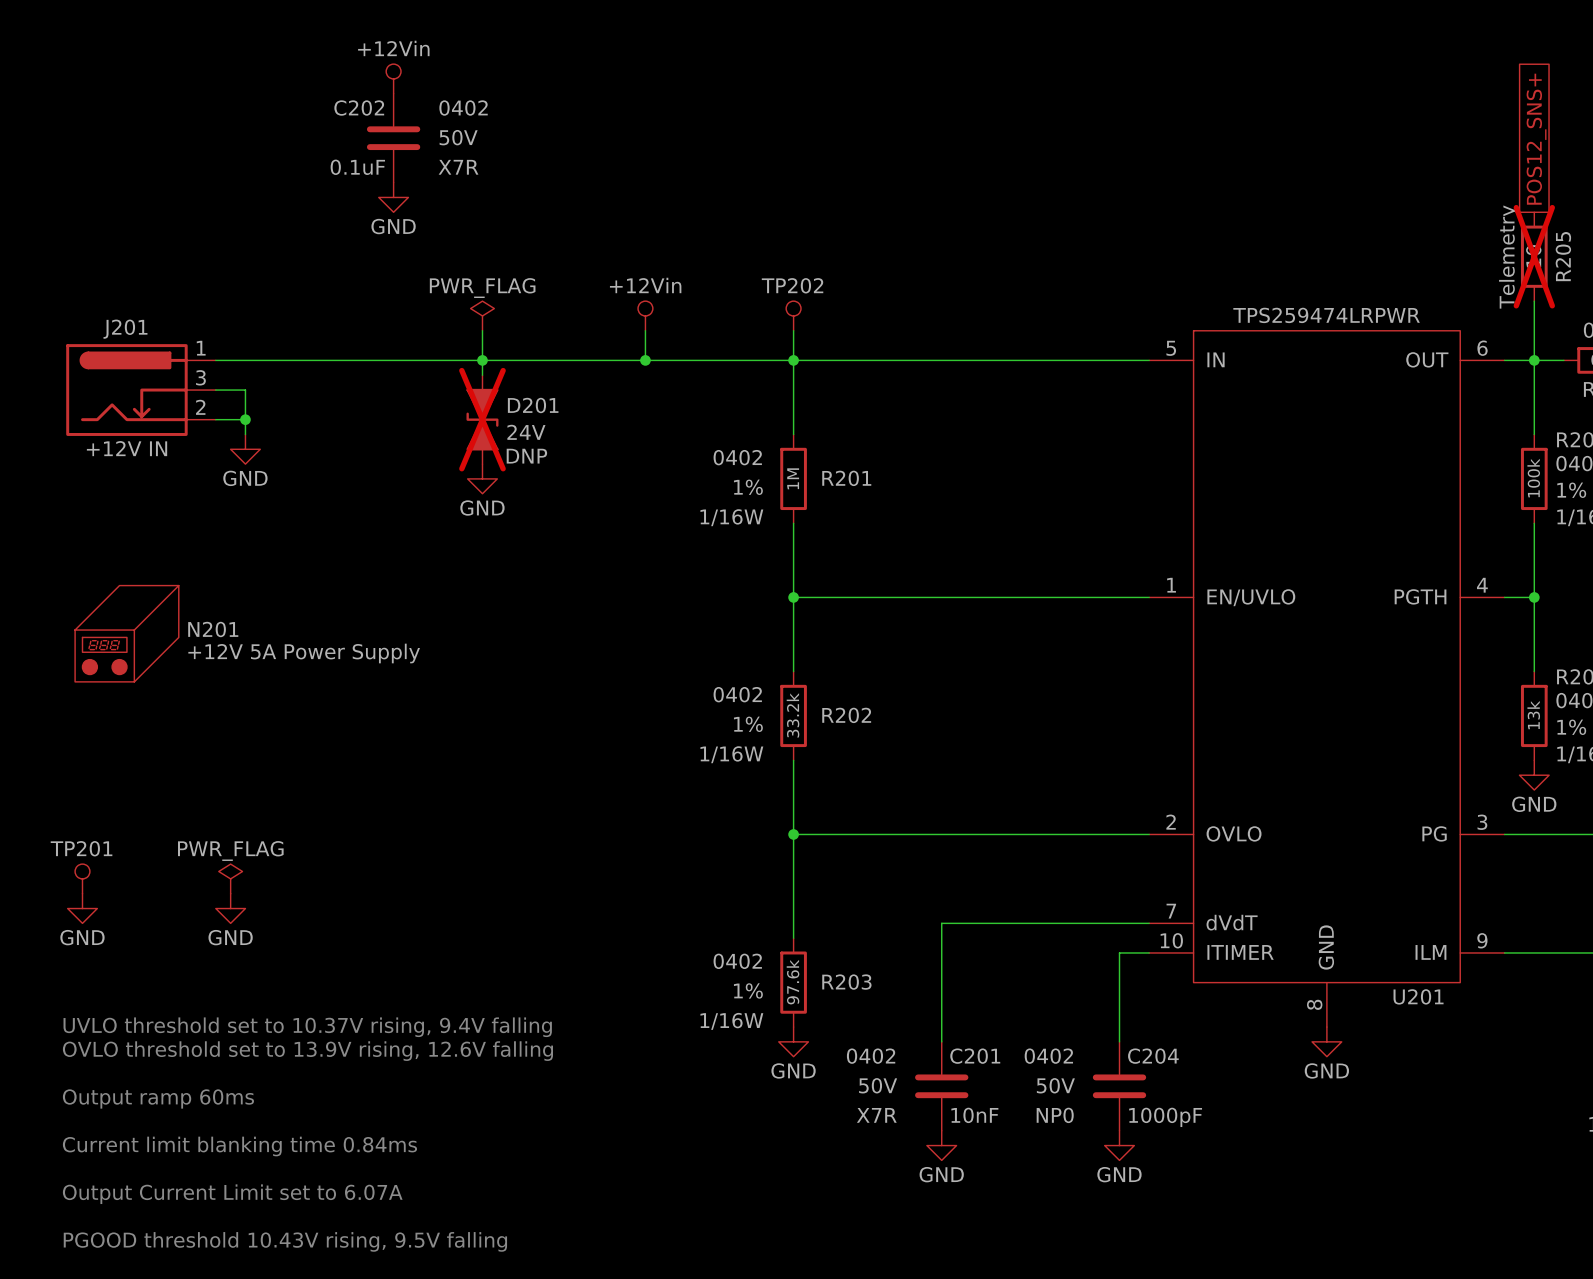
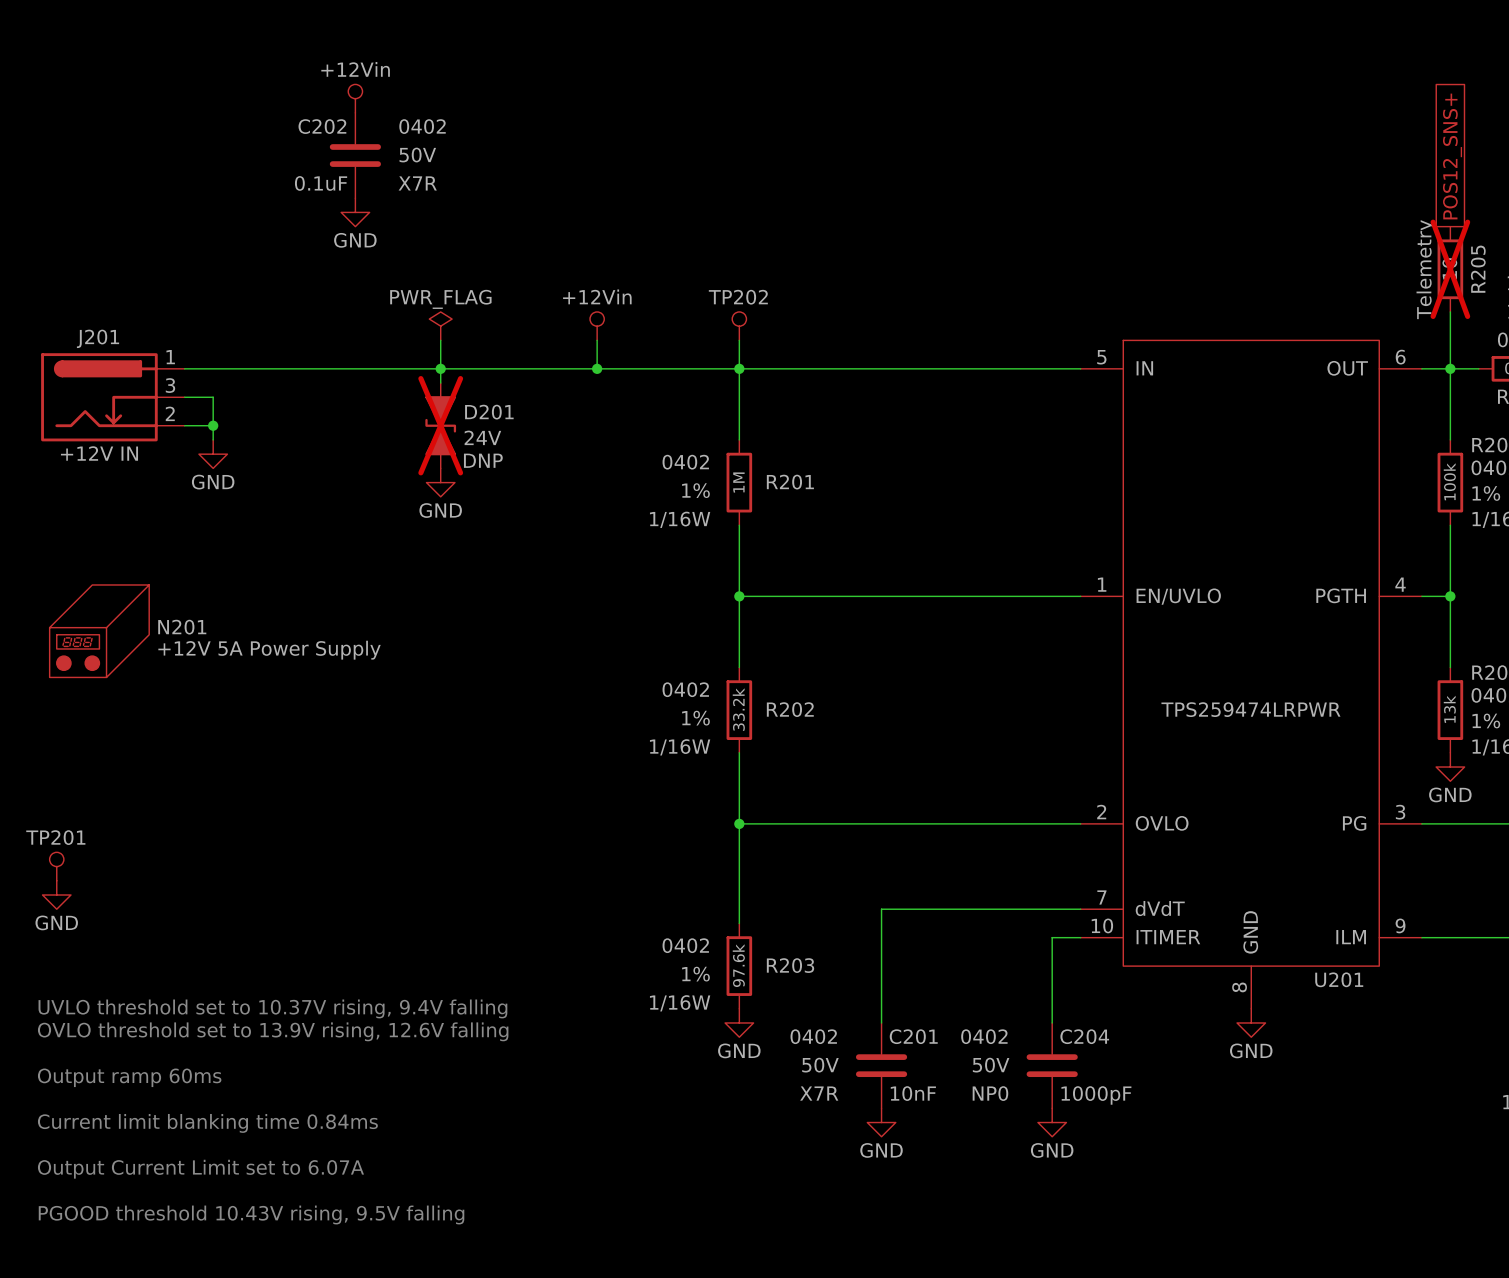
U201 value position: TPS259474LRPWR (1326, 315) -> TPS259474LRPWR (1250, 709)
power symbol: PWR_FLAG (230, 878) -> none
power symbol: GND (230, 908) -> none

